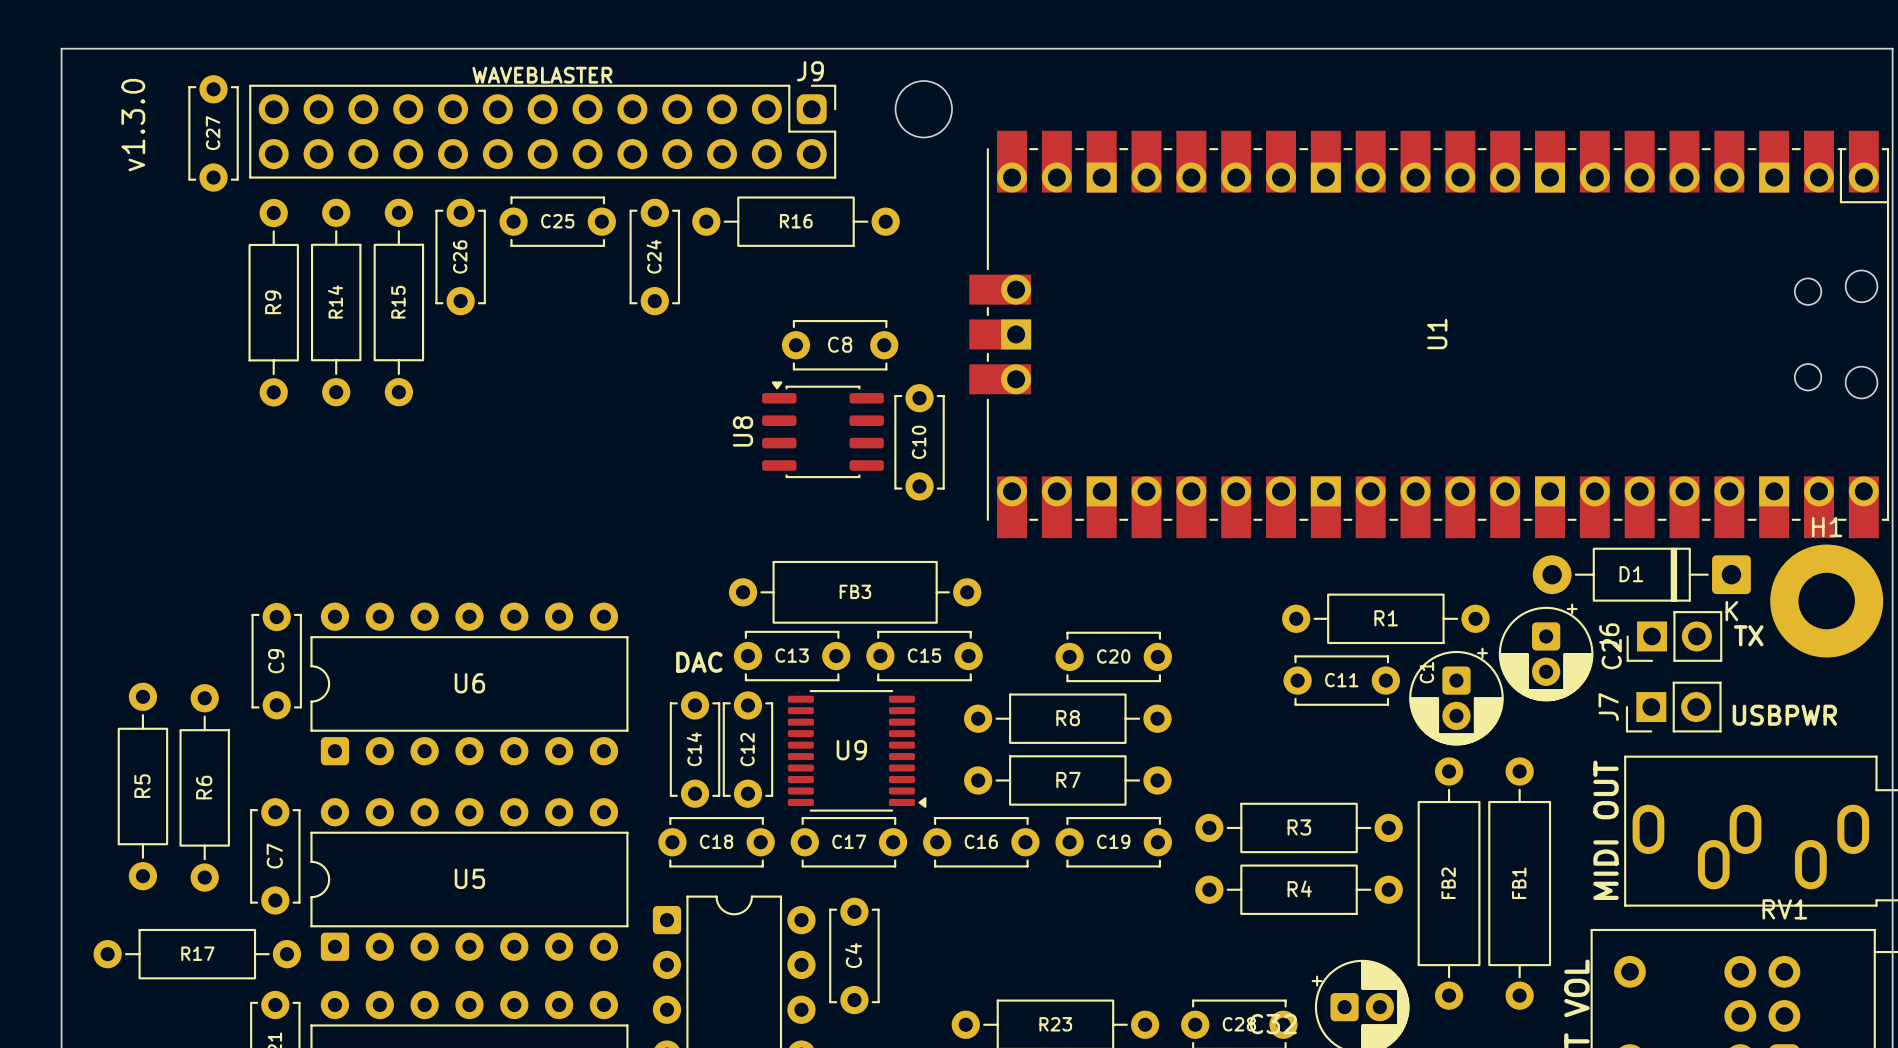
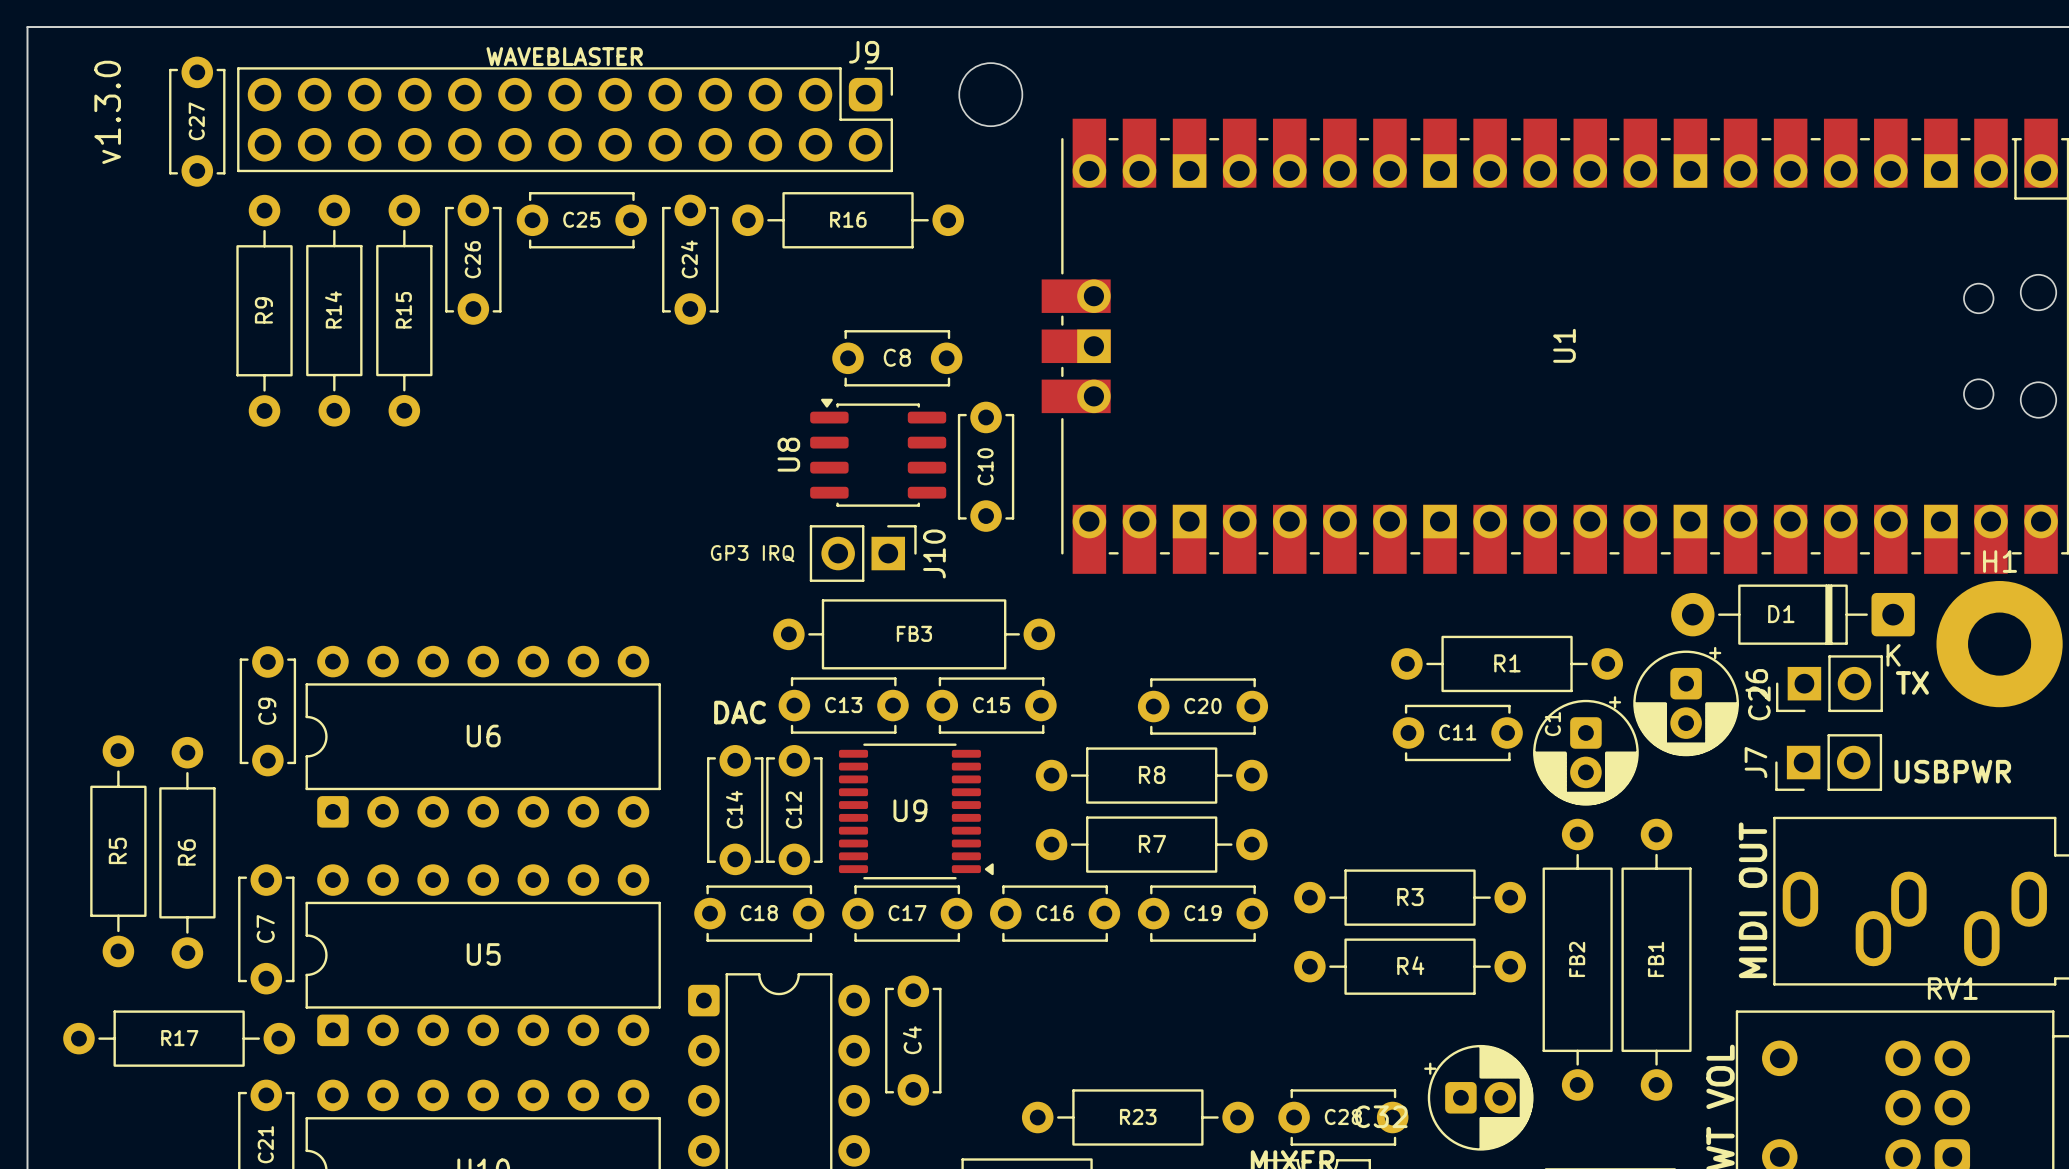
J10: none -> (863, 553)
text: none -> GP3 IRQ (752, 553)

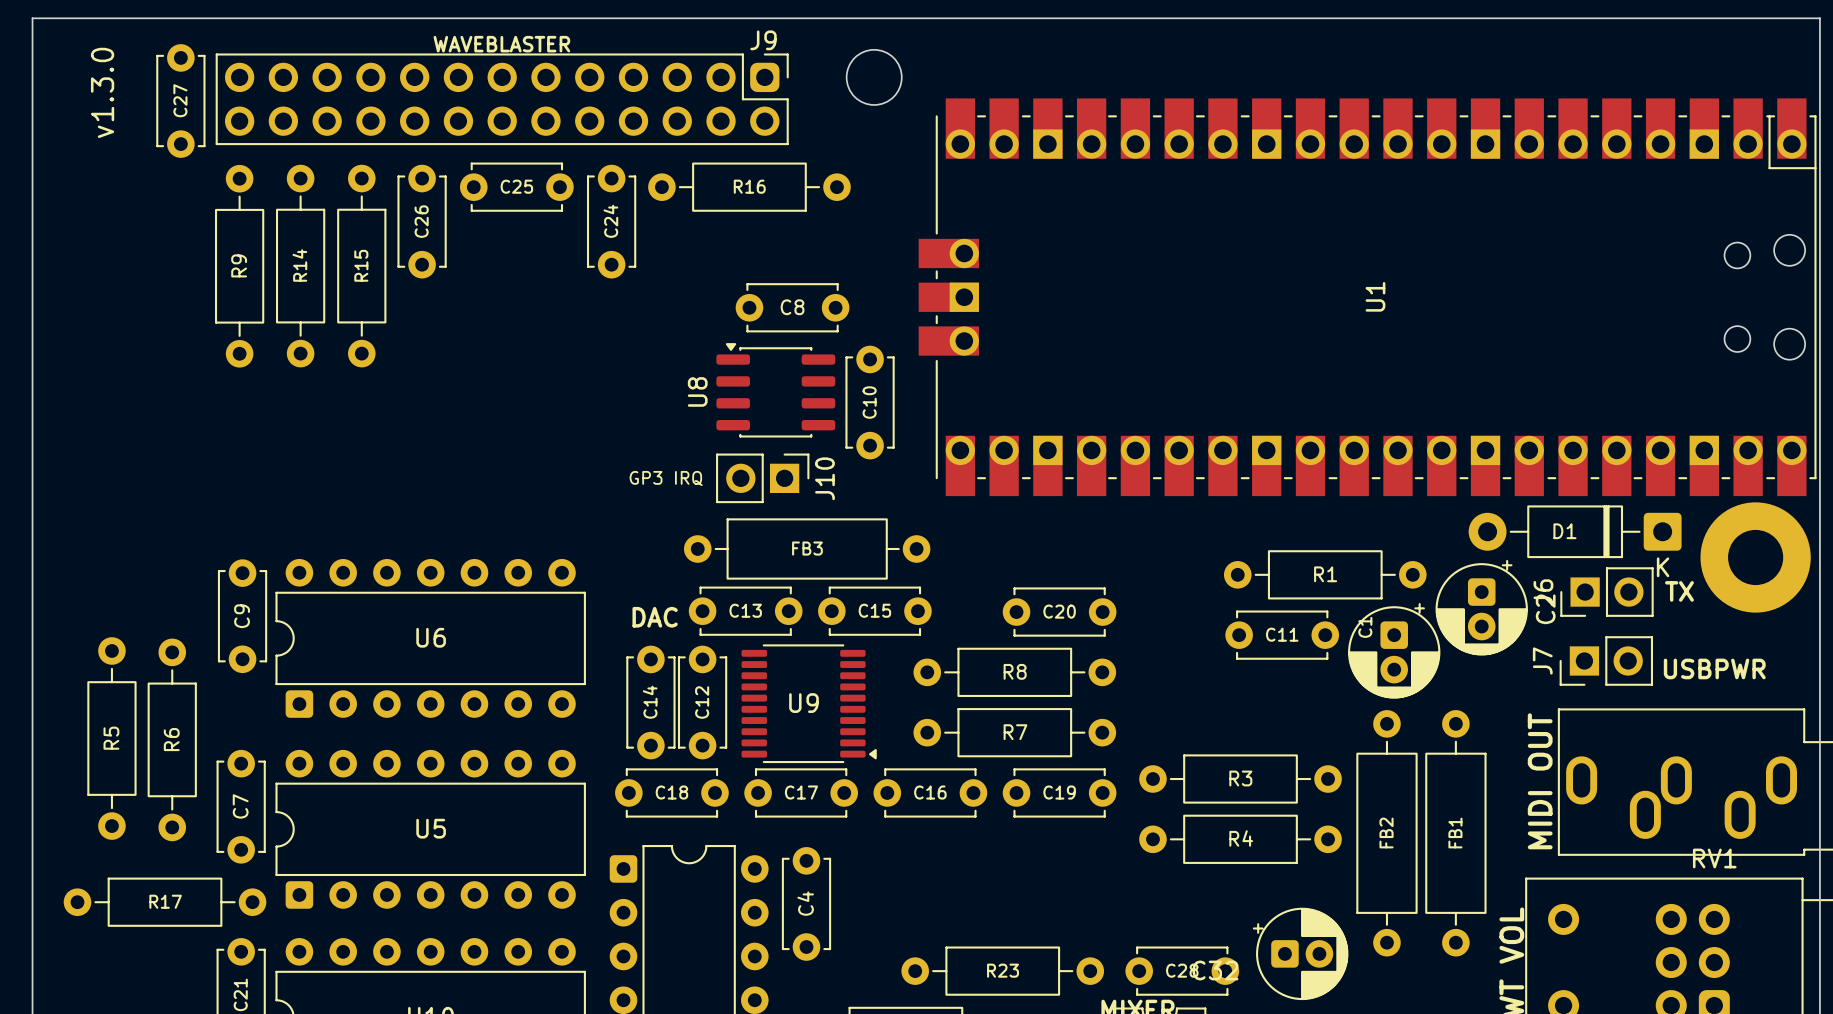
H1 name: H1 (2000, 561) -> none

